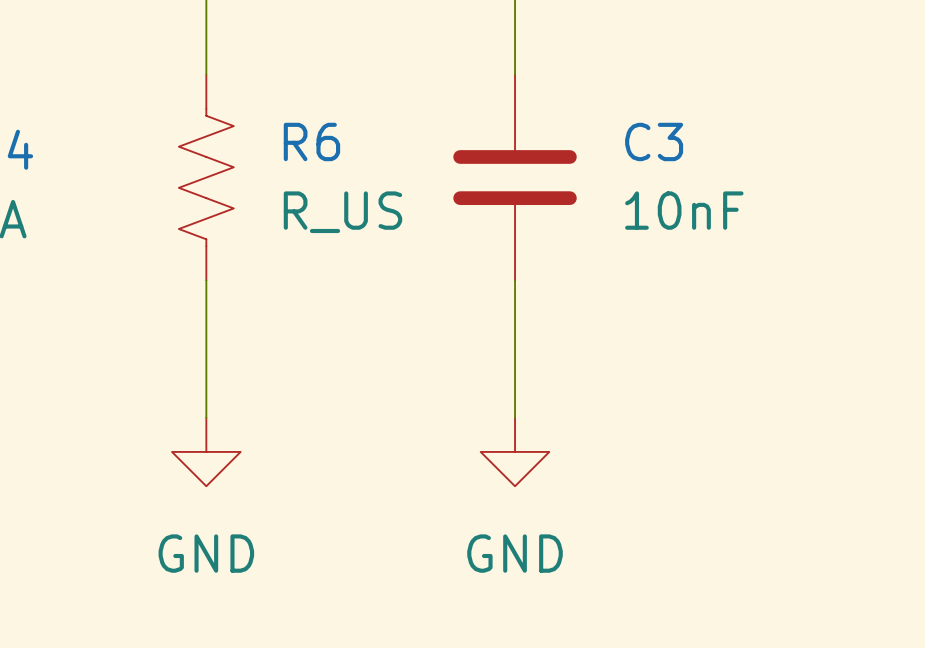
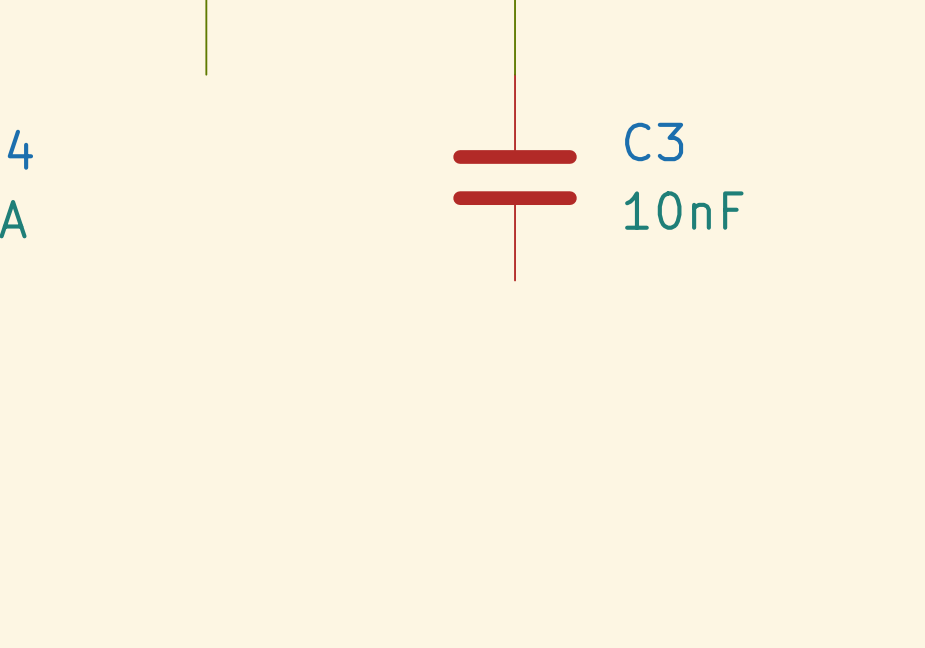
R6: R_US (206, 177) -> none
wire: (206, 280) (206, 417) -> none
wire: (515, 280) (515, 417) -> none
power symbol: GND (206, 451) -> none
power symbol: GND (515, 451) -> none

